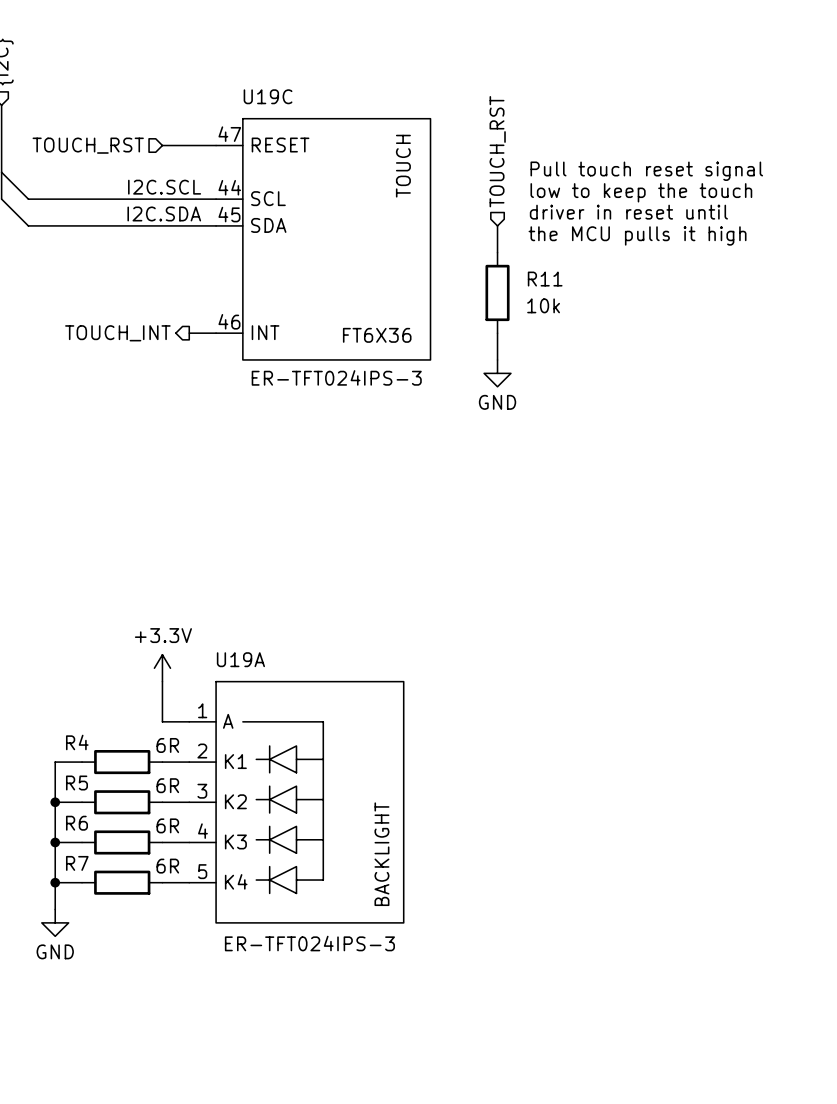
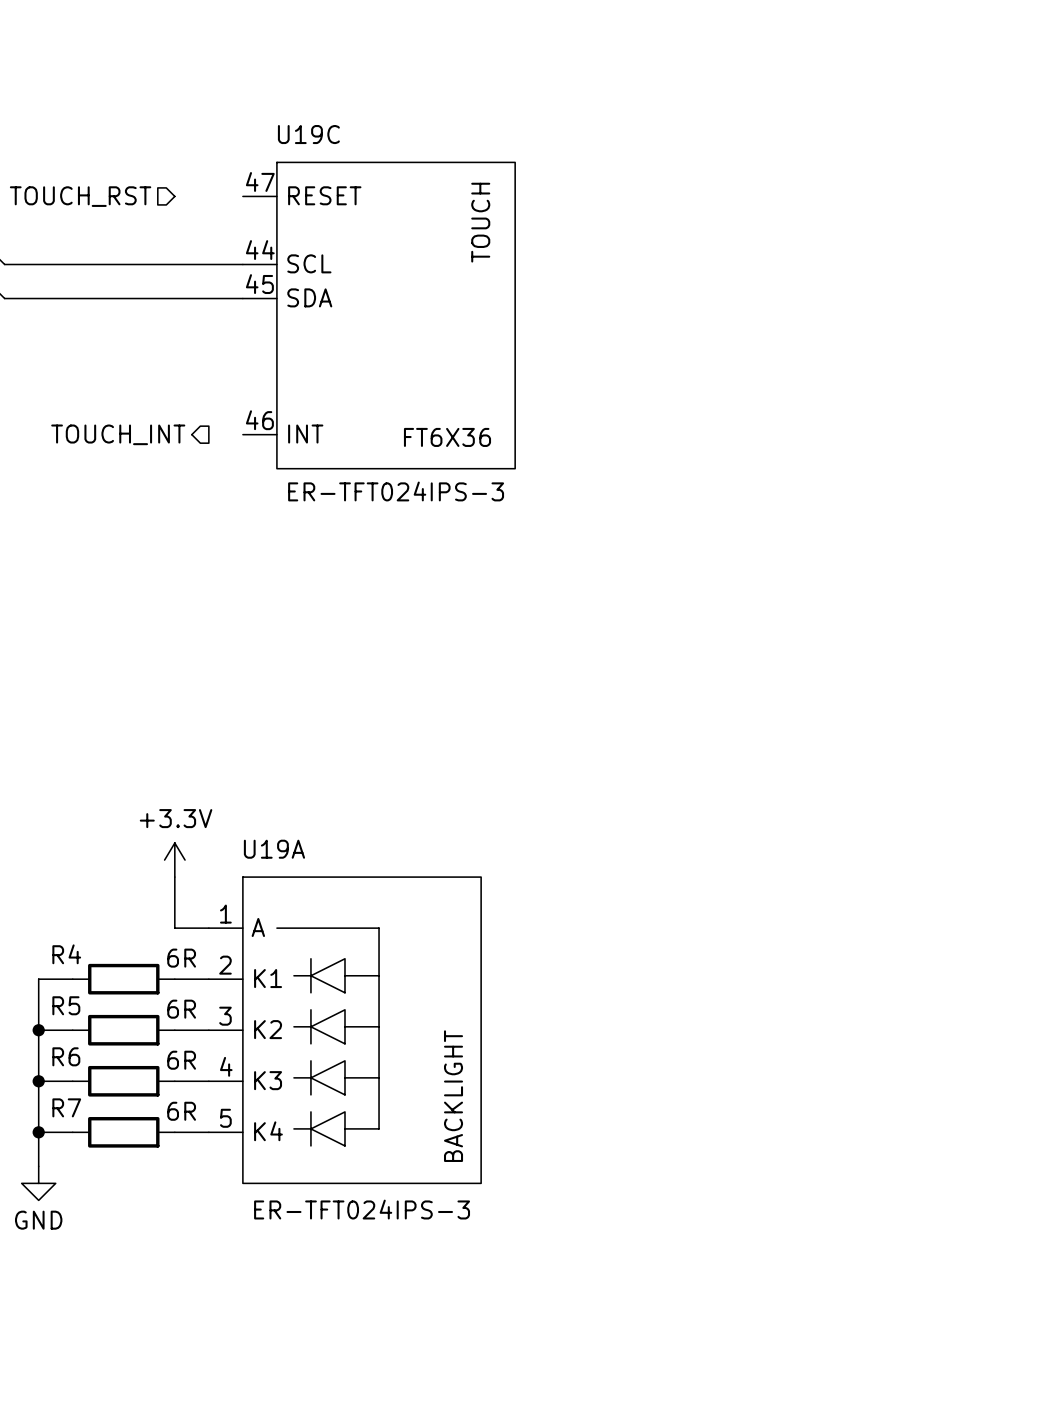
wire: (162, 145) (216, 145) -> none
hierarchical label: TOUCH_RST (497, 151) -> none
text: Pull touch reset signal (646, 171) -> none
label: I2C.SCL (164, 187) -> none
text: low to keep the touch (641, 192) -> none
text: driver in reset until (628, 212) -> none
label: I2C.SDA (164, 213) -> none
wire: (497, 225) (497, 252) -> none
text: the MCU pulls it high (637, 235) -> none
R11: 10k (497, 292) -> none
wire: (189, 333) (216, 333) -> none
wire: (497, 333) (497, 359) -> none
power symbol: GND (497, 373) -> none

